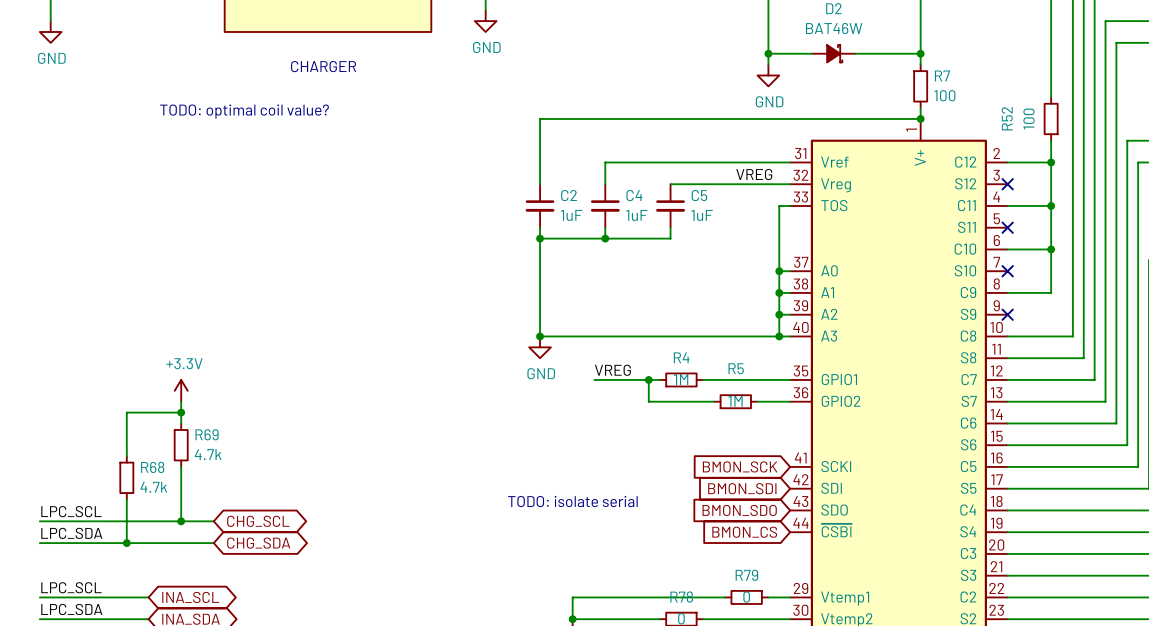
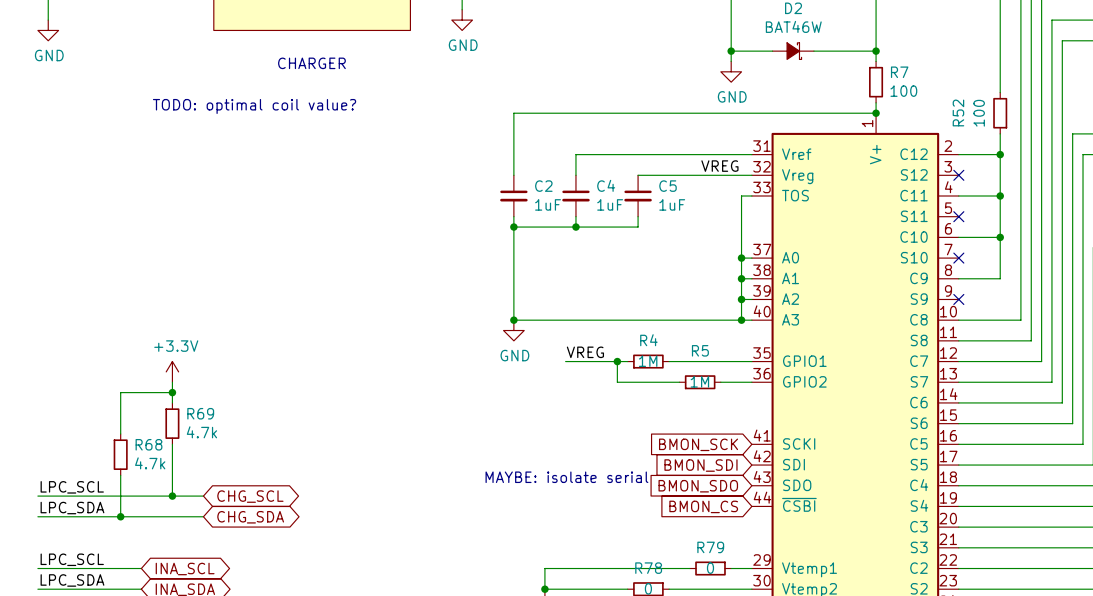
text: TODO: isolate serial (572, 501) -> MAYBE: isolate serial (566, 477)

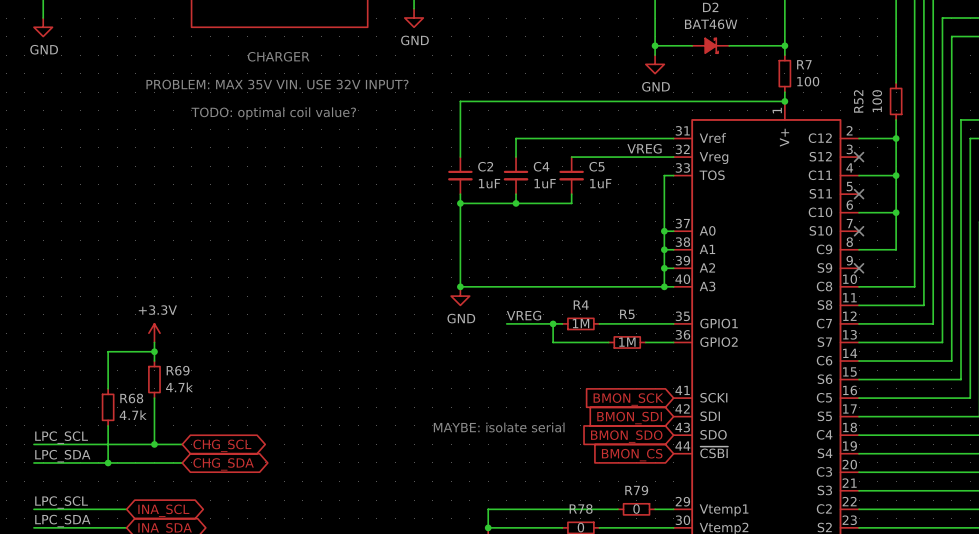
text: none -> PROBLEM: MAX 35V VIN. USE 32V INPUT? (277, 84)
text position: TODO: optimal coil value? (254, 106) -> TODO: optimal coil value? (273, 113)

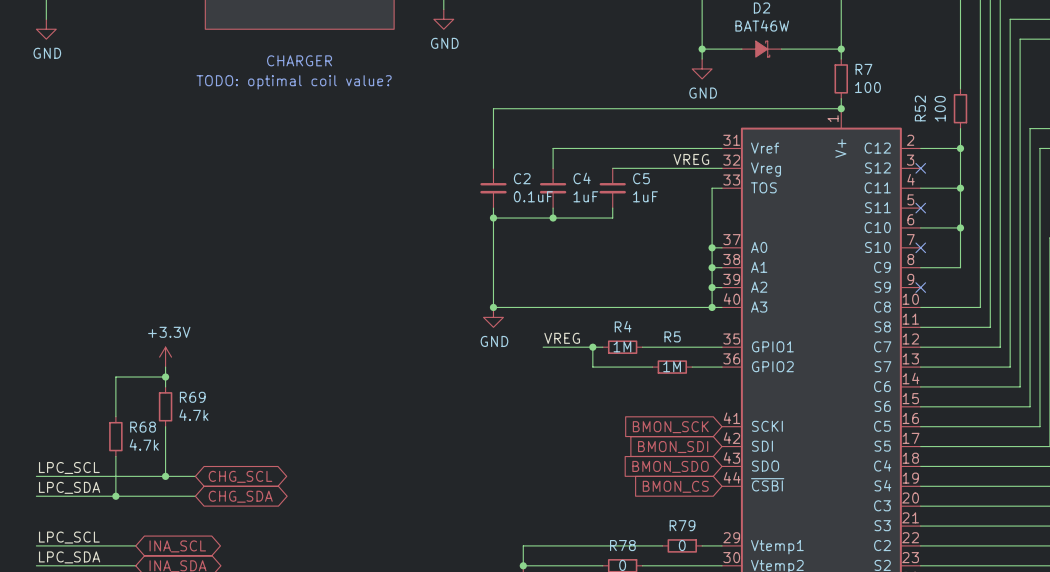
text: PROBLEM: MAX 35V VIN. USE 32V INPUT? (277, 84) -> none
text position: TODO: optimal coil value? (273, 113) -> TODO: optimal coil value? (294, 82)
C2 value: 1uF (489, 183) -> 0.1uF (533, 196)
text: MAYBE: isolate serial (499, 427) -> none

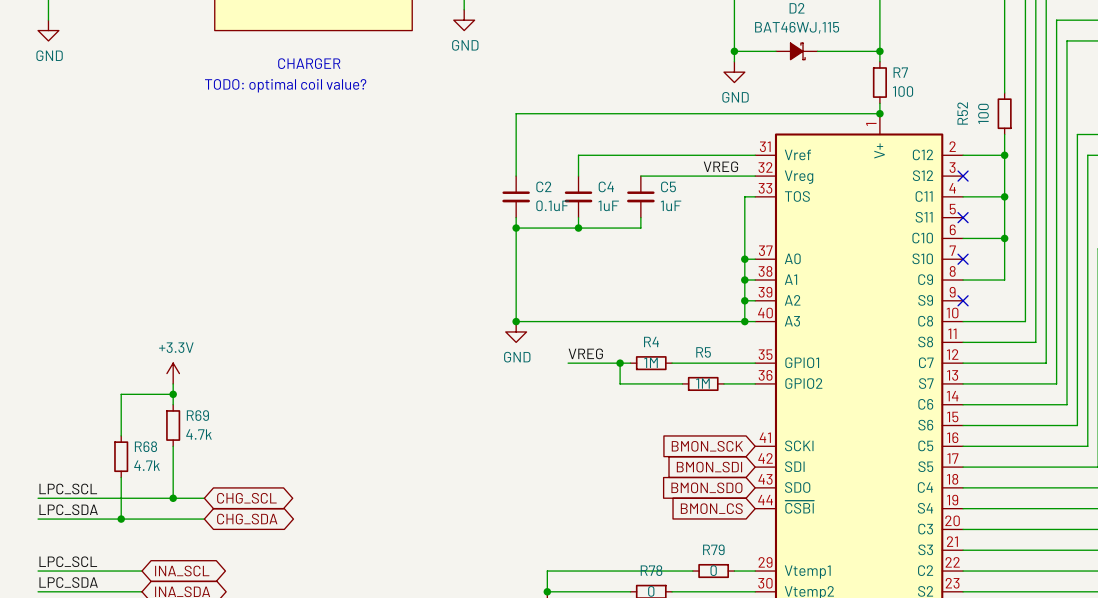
D2 value: BAT46W (762, 25) -> BAT46WJ,115 (797, 27)

